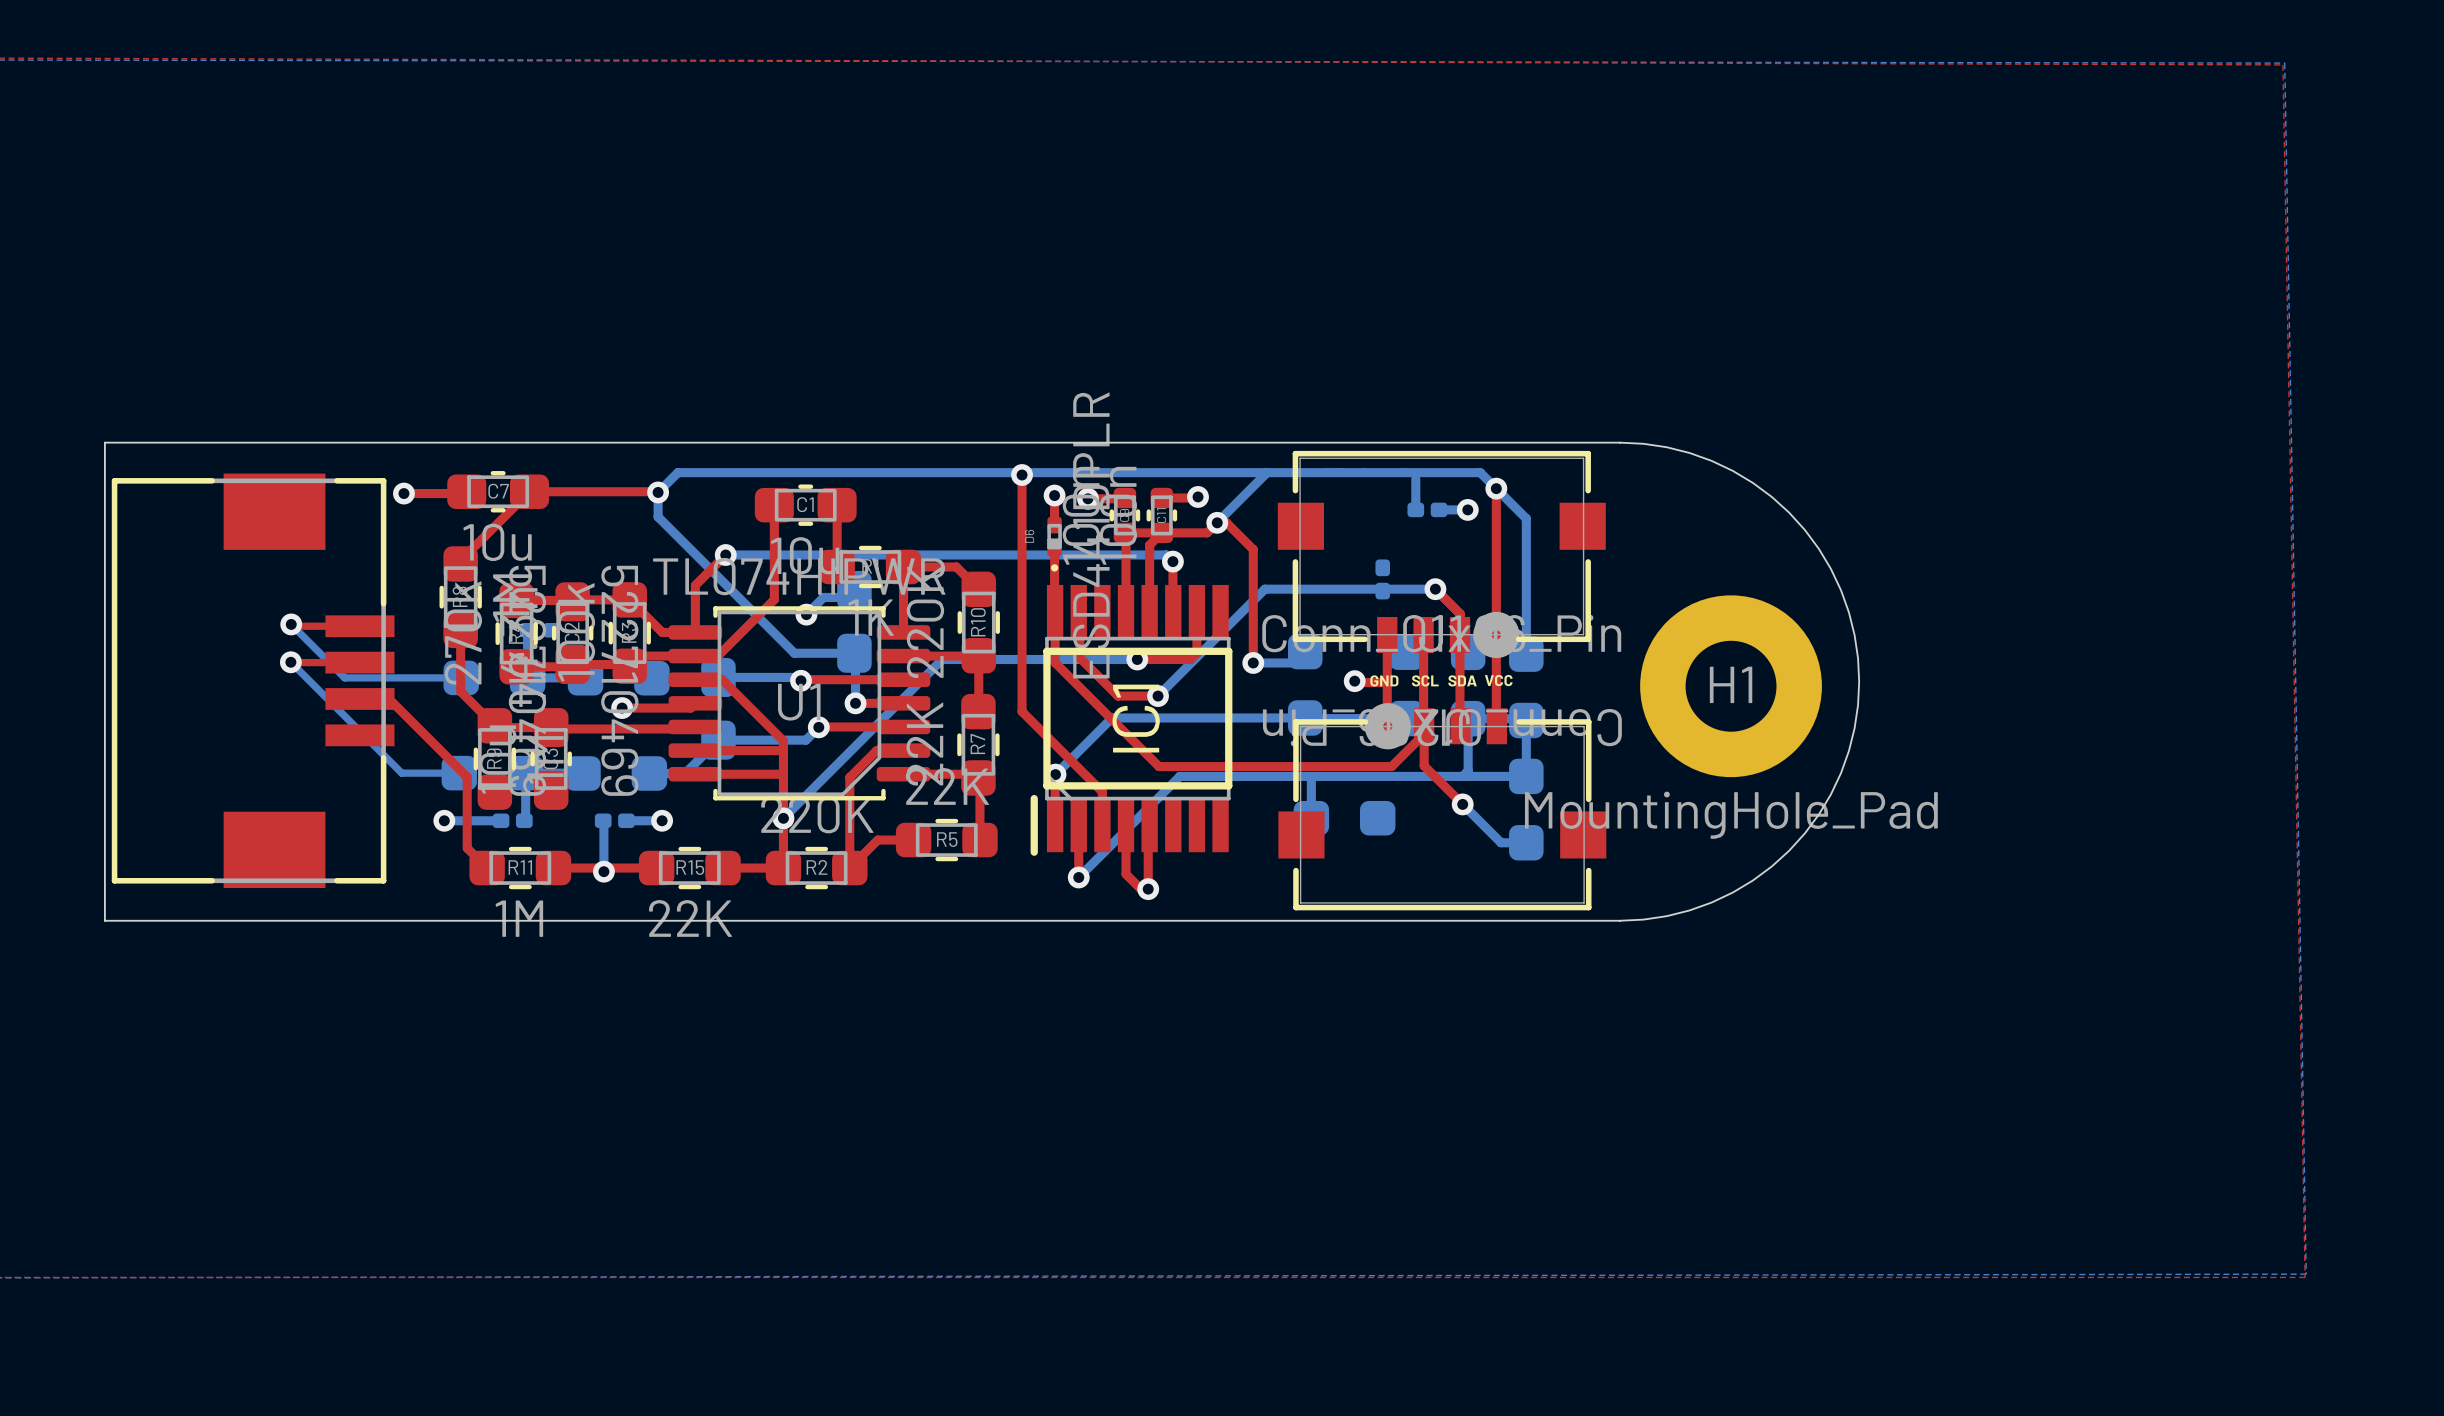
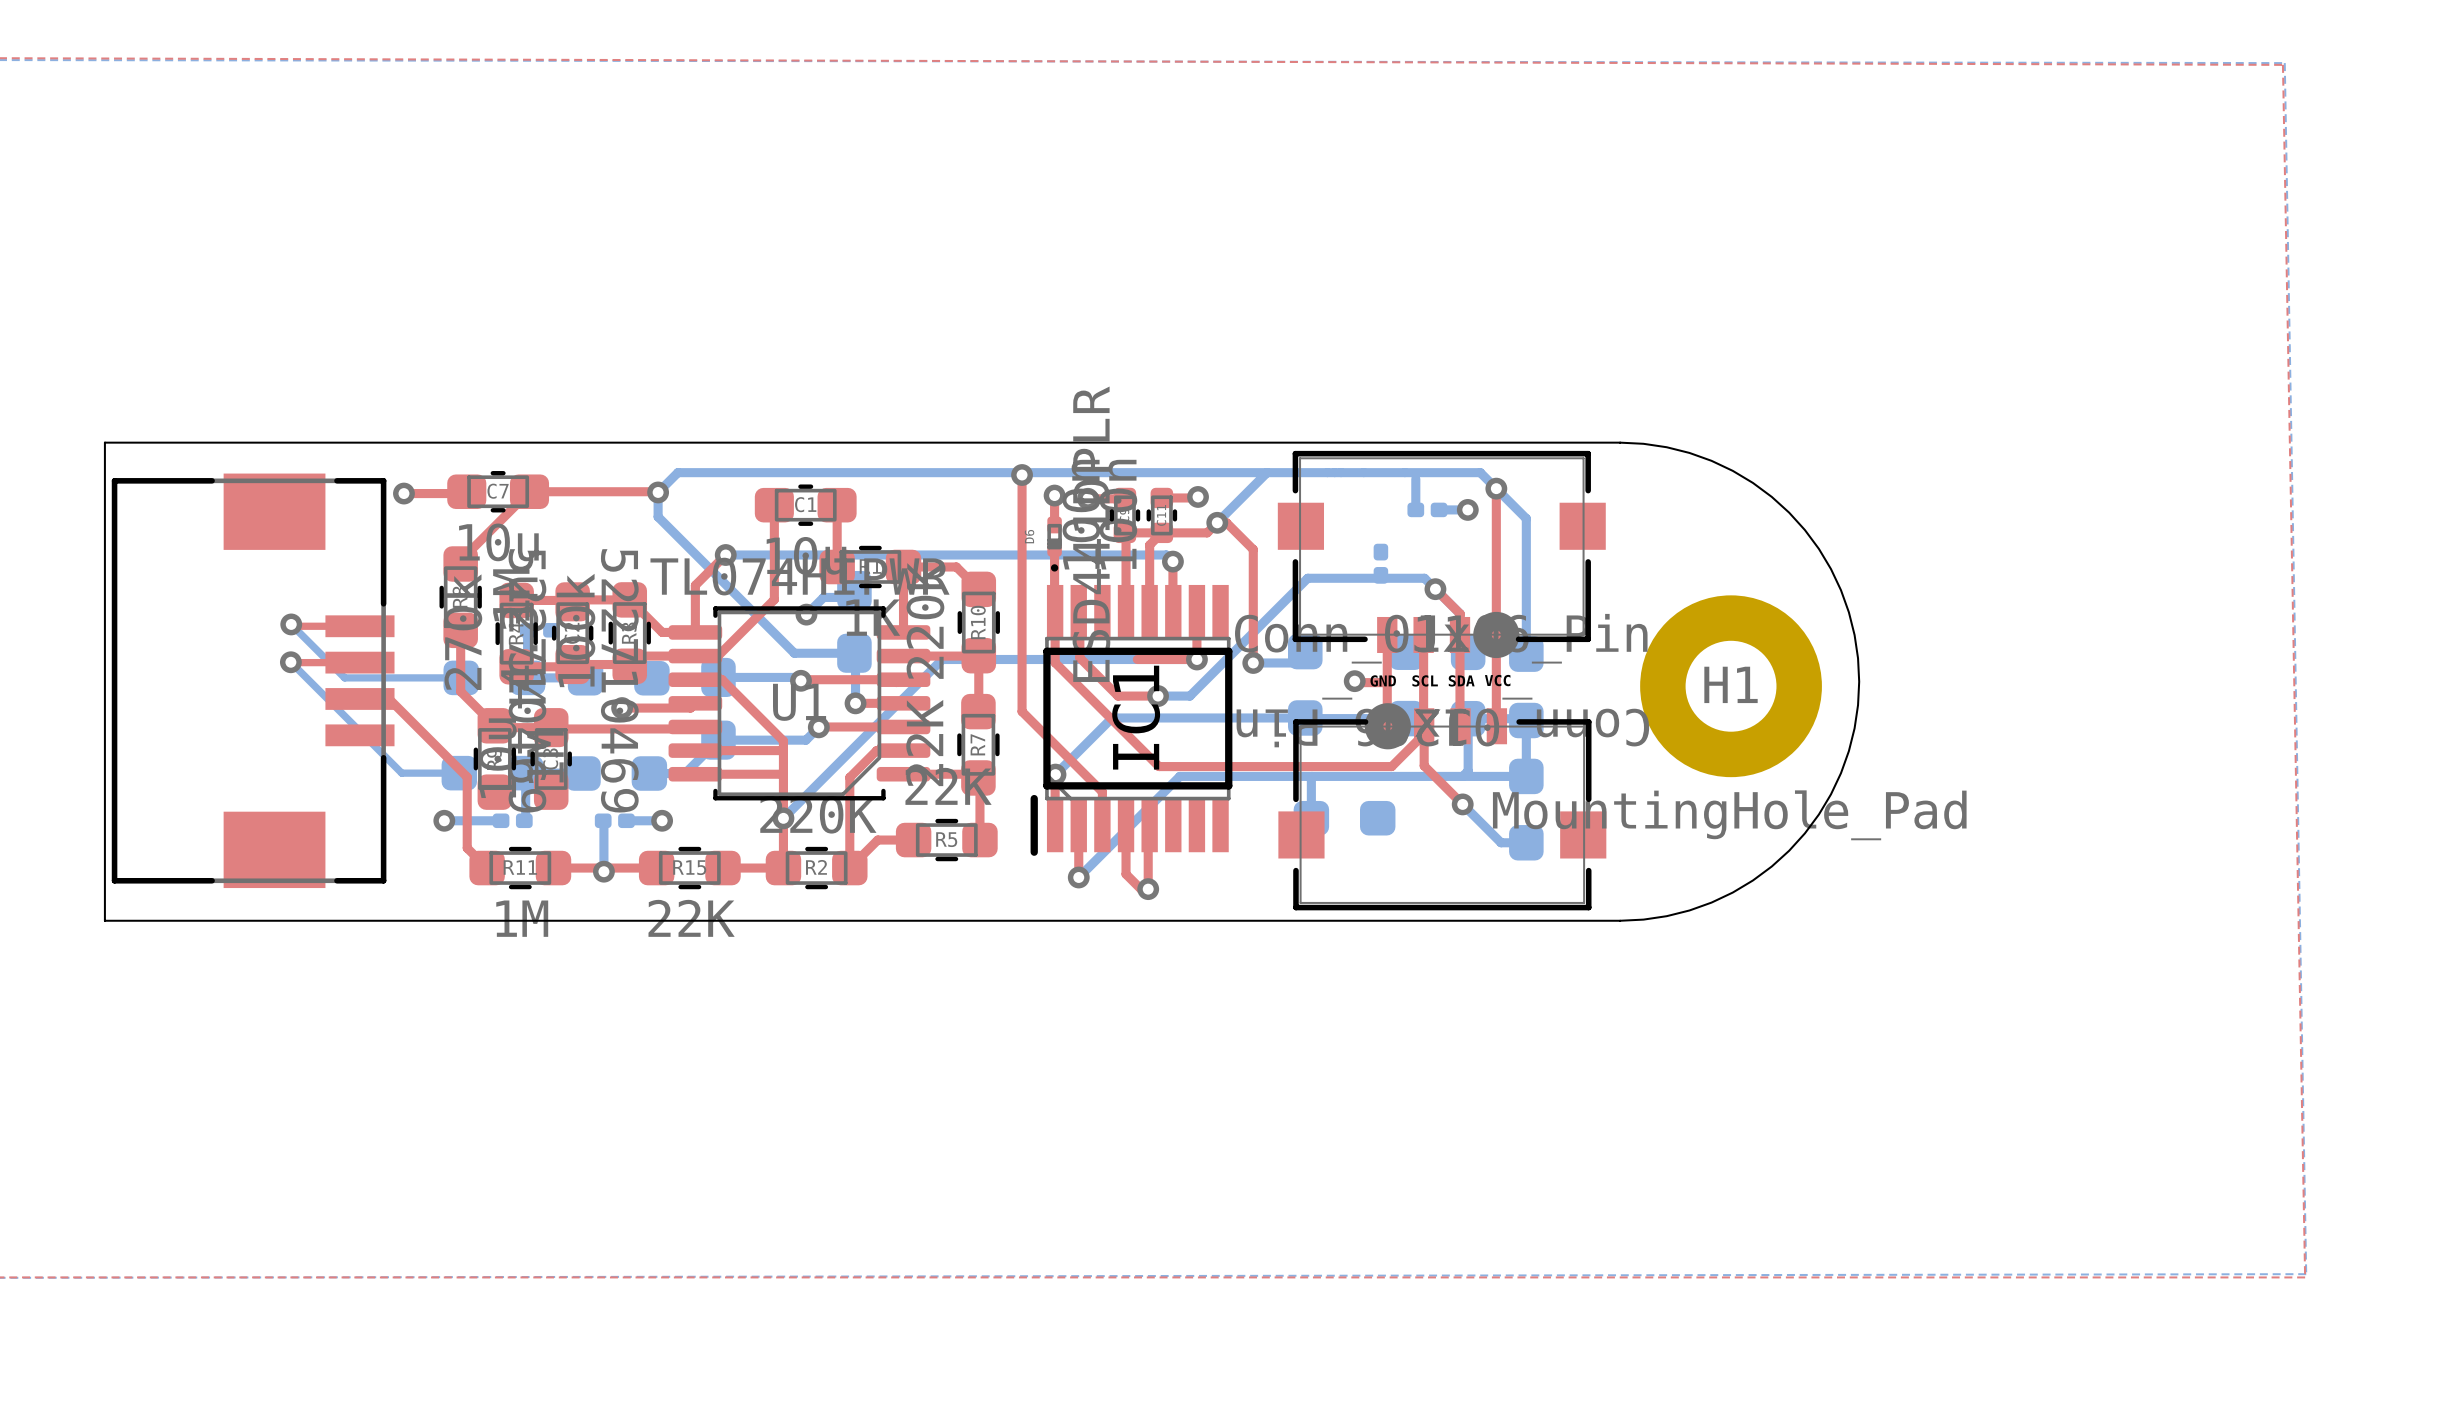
part position: (1382, 579) -> (1380, 563)
bottom track: (1435, 589) (1264, 589) (1158, 696) -> (1435, 589) (1424, 578) (1307, 578) (1189, 696) (1158, 696)
via position: (1137, 659) -> (1196, 659)

